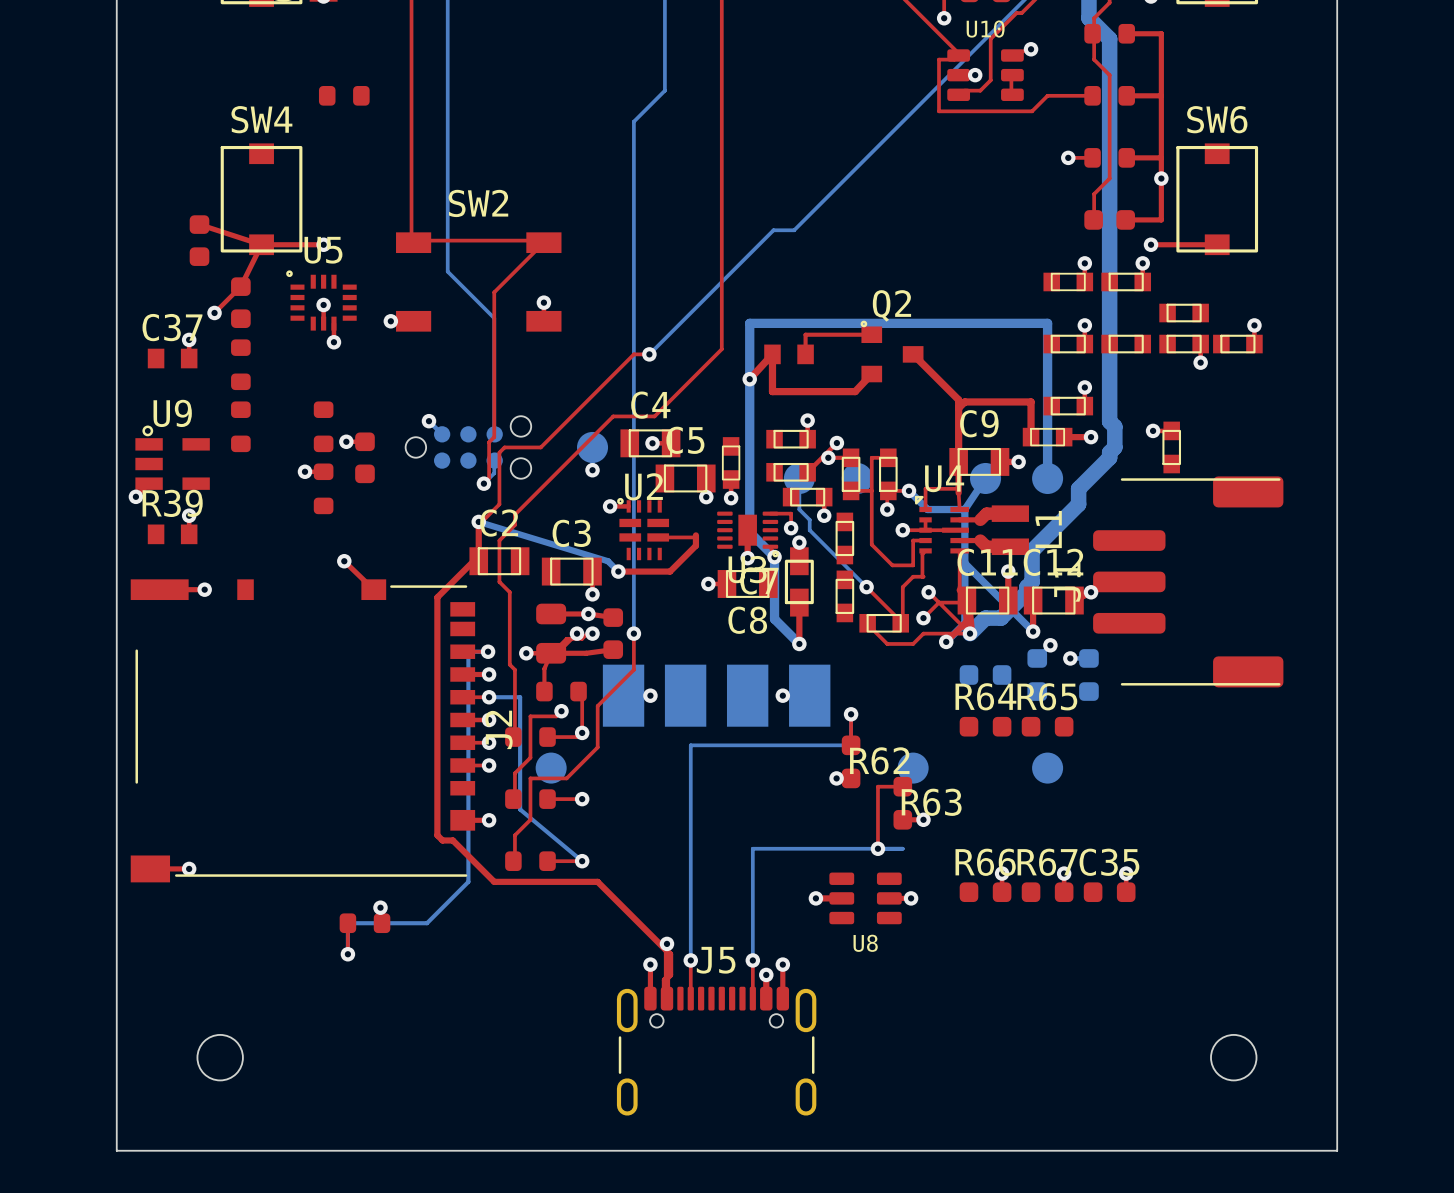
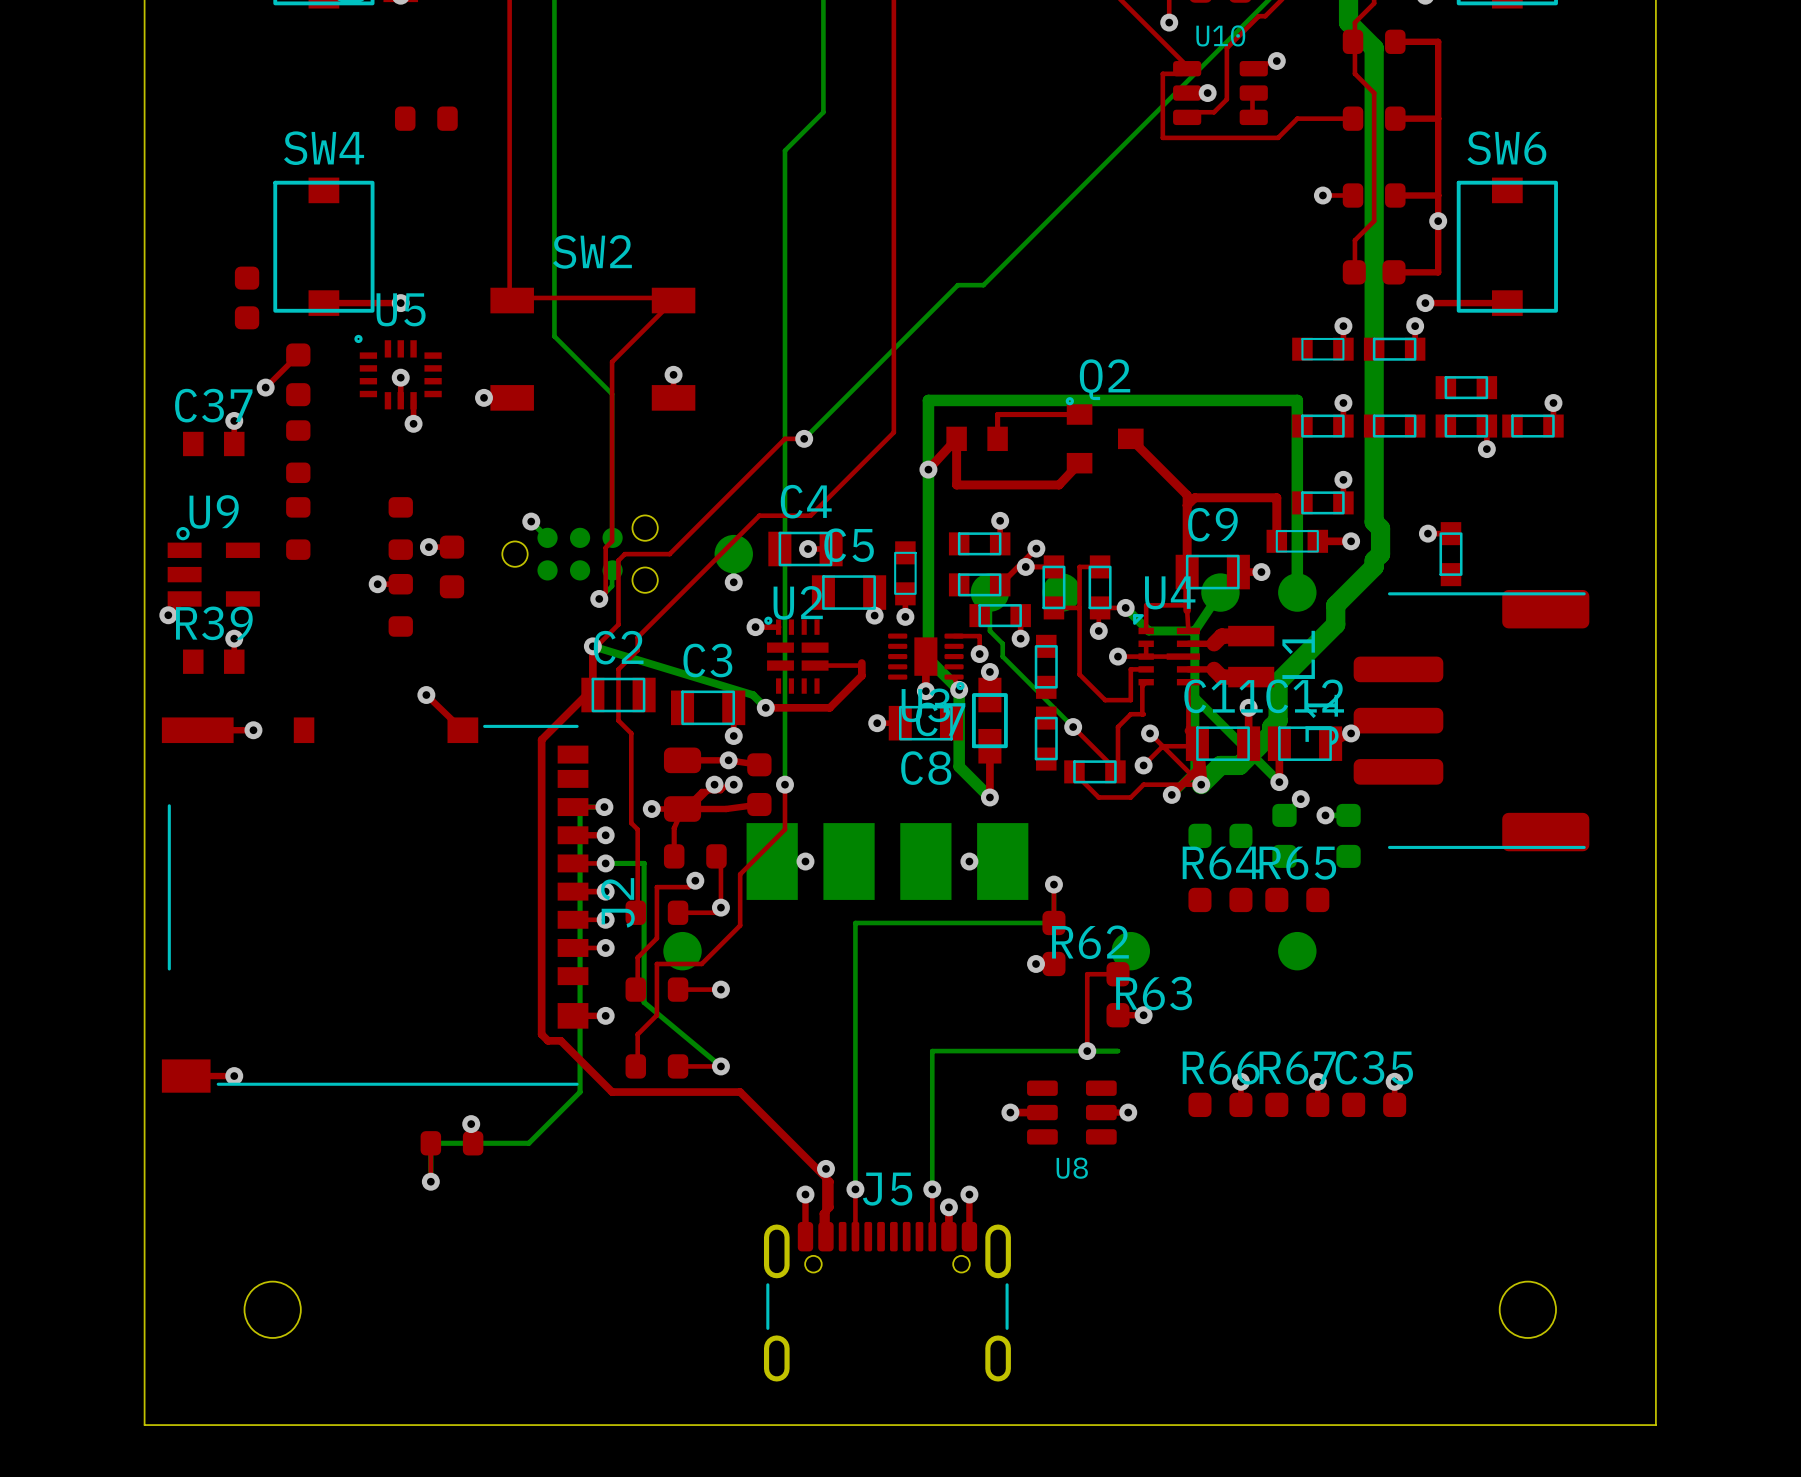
top track: (199, 224) (261, 244) (240, 286) -> none

